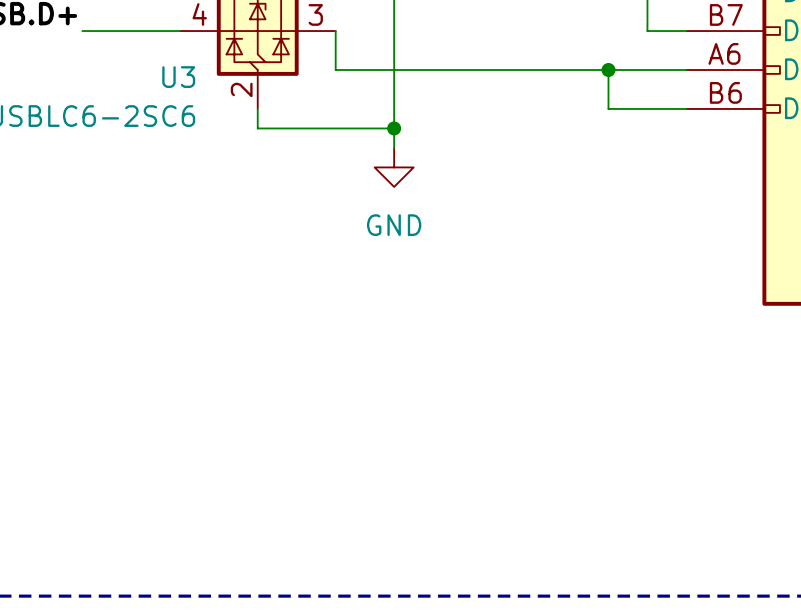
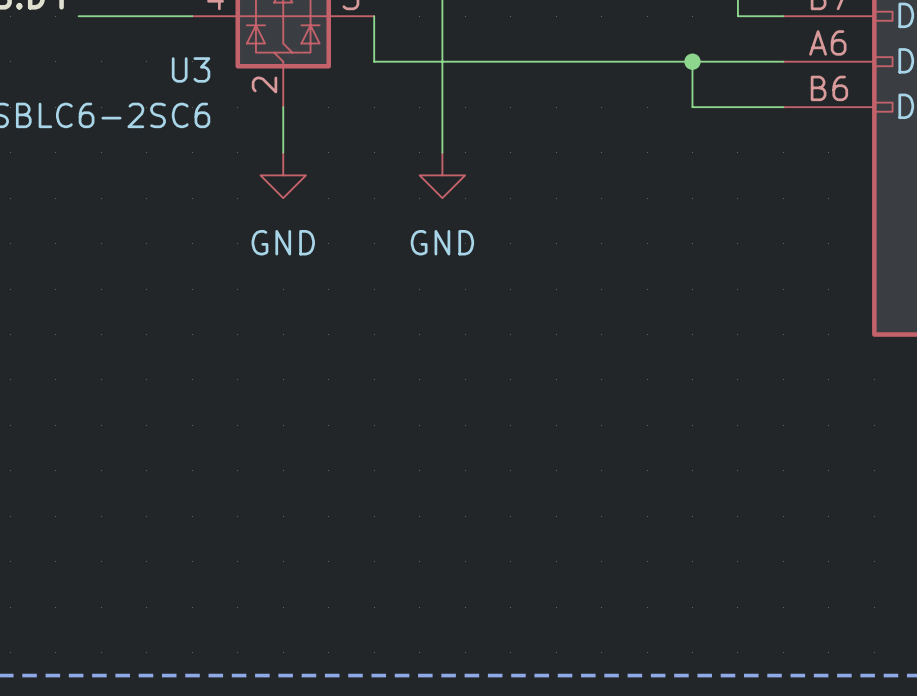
wire: (257, 128) (394, 128) -> (283, 129) (283, 152)
junction: (394, 128) -> none
power symbol: none -> GND (283, 175)

